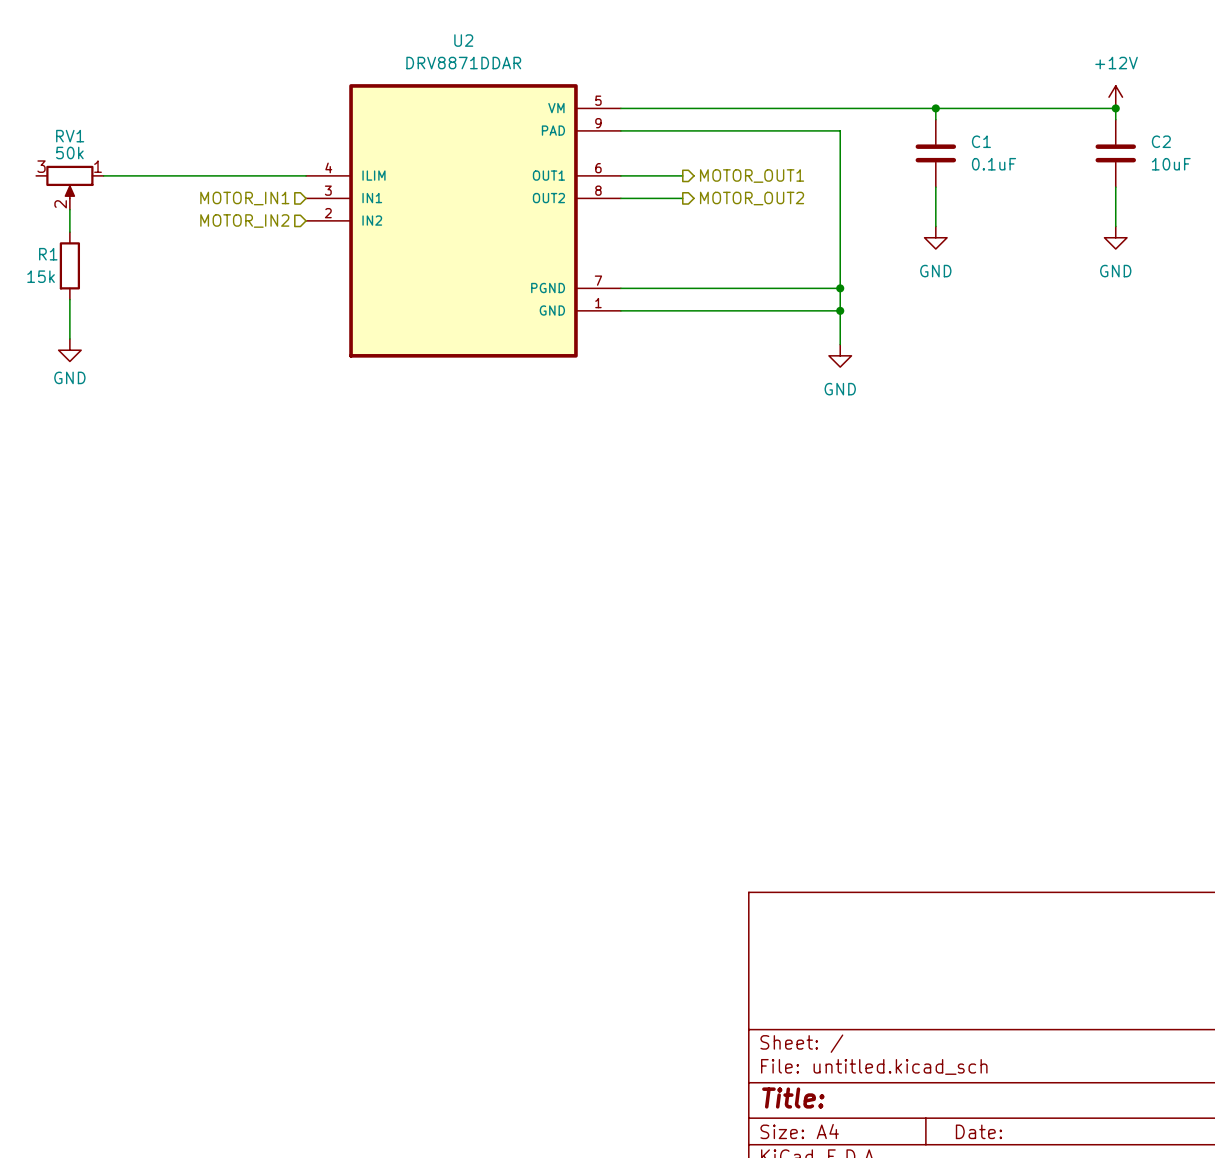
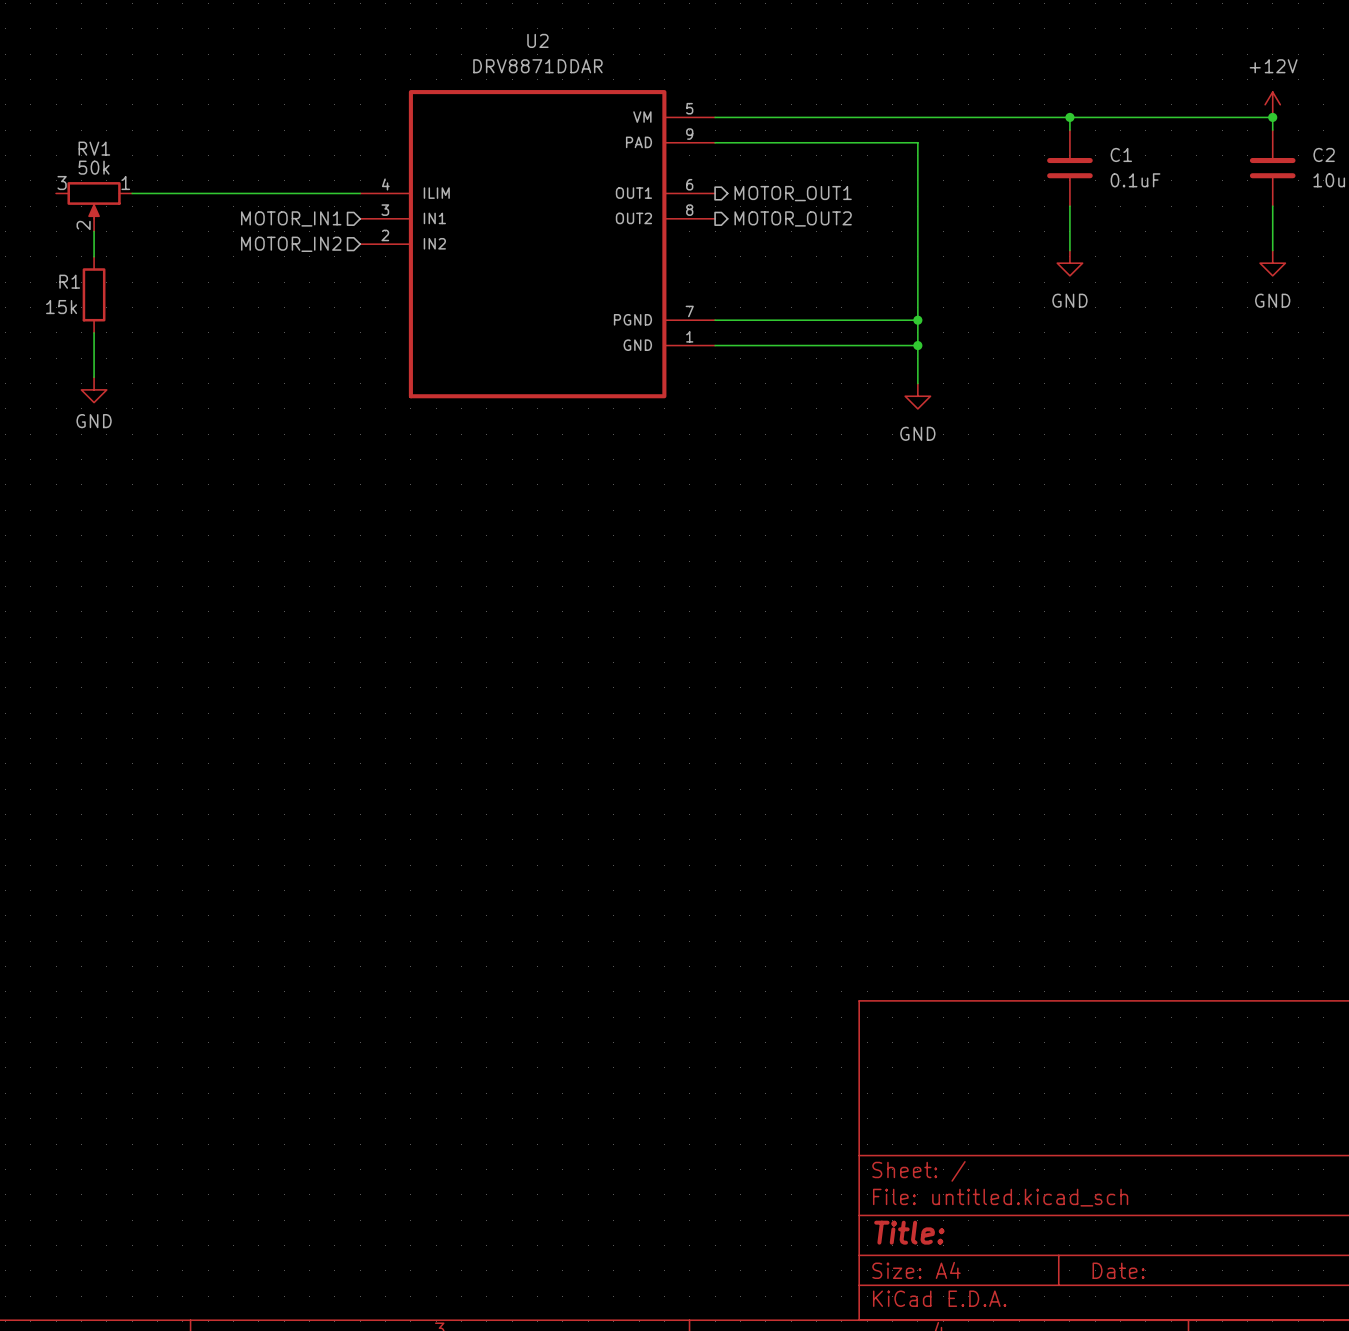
wire: (800, 130) (840, 130) (840, 344) -> (917, 142) (917, 383)
wire: (620, 175) (682, 175) -> none
hierarchical label position: MOTOR_OUT1 (752, 176) -> MOTOR_OUT1 (793, 193)
wire: (620, 198) (682, 198) -> none
hierarchical label position: MOTOR_OUT2 (752, 198) -> MOTOR_OUT2 (793, 218)
wire: (800, 288) (840, 288) -> none
junction: none -> (917, 320)
junction: (840, 288) -> none
wire: (800, 310) (840, 310) -> none
junction: none -> (917, 345)
junction: (840, 310) -> none
power symbol position: GND (840, 355) -> GND (917, 396)

